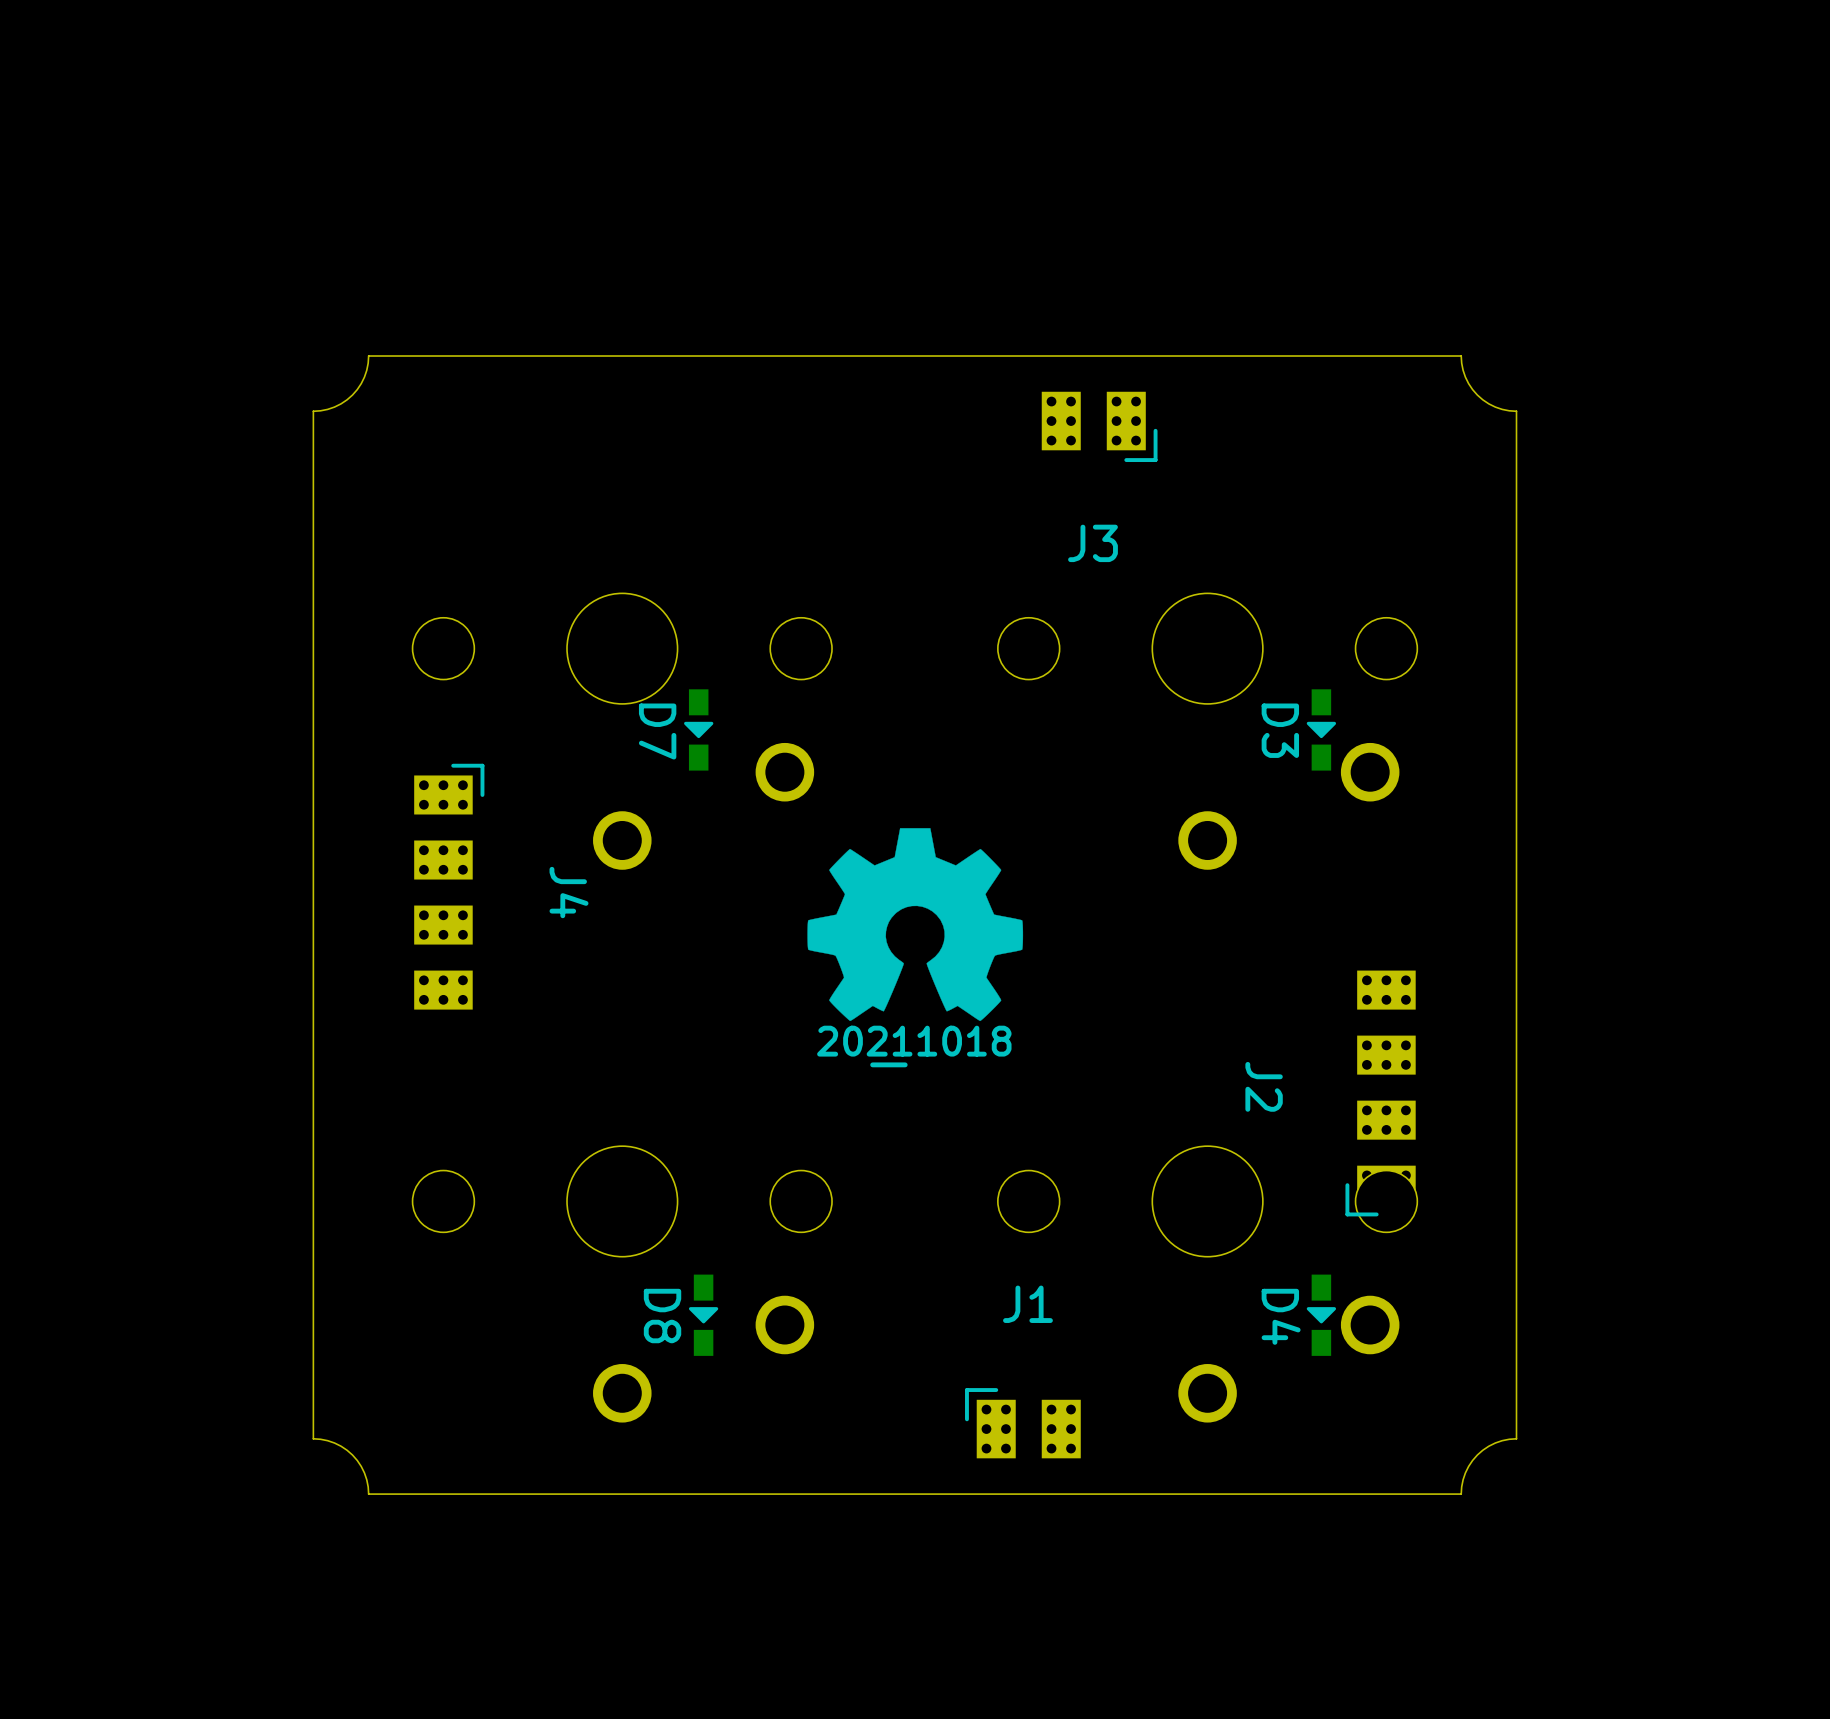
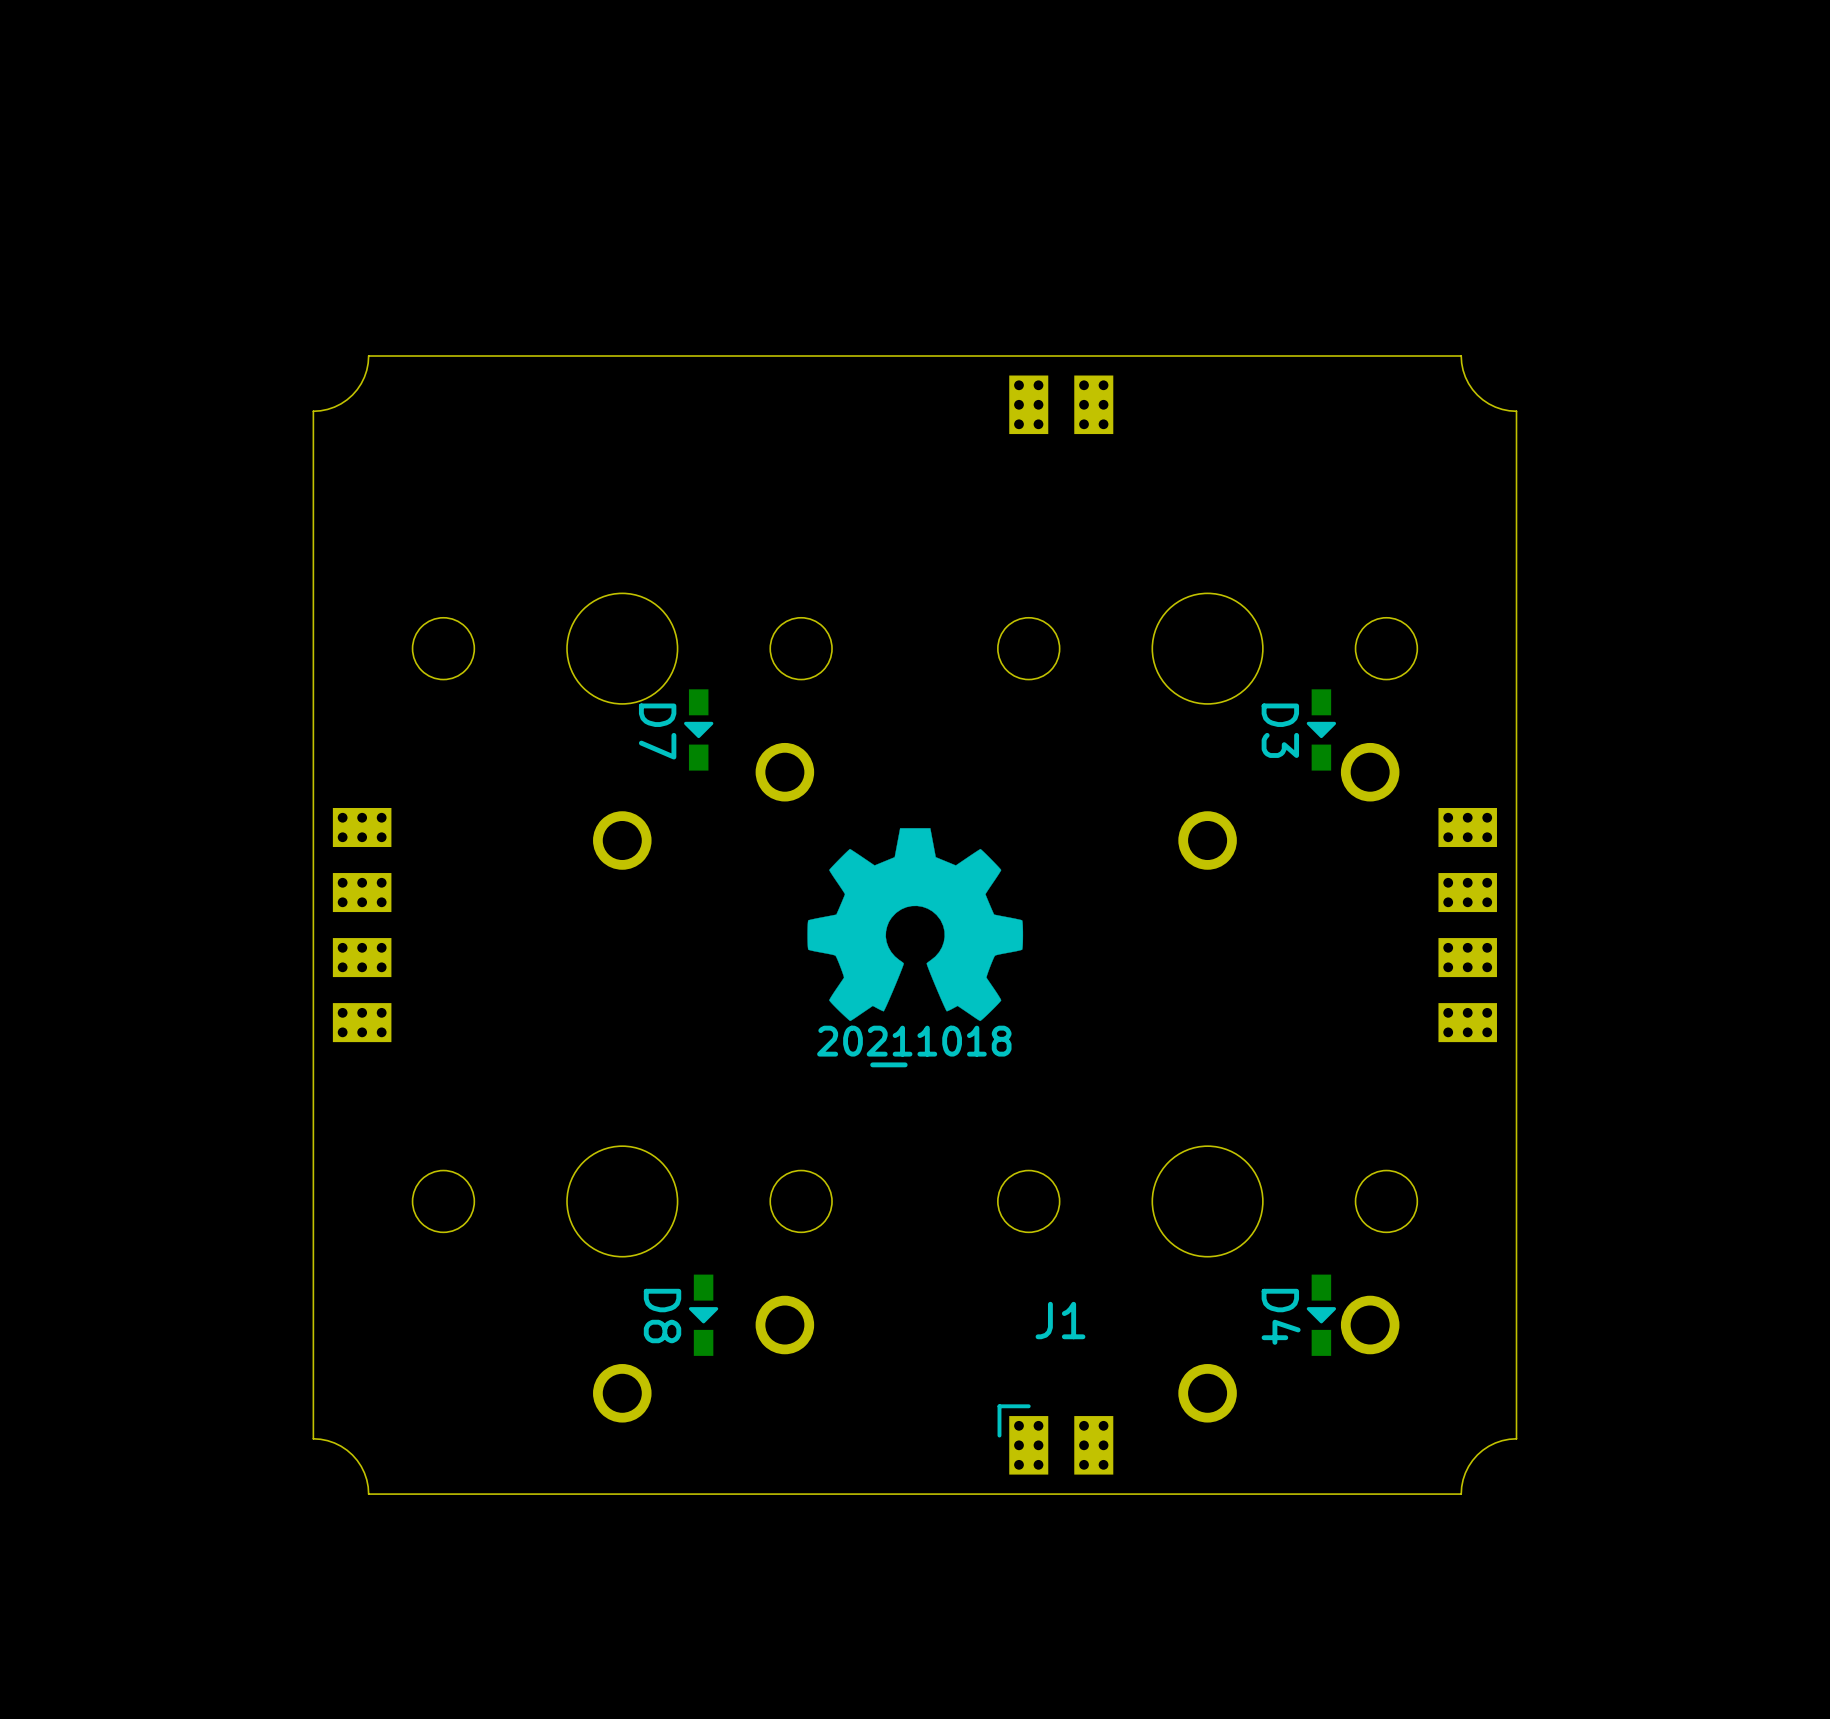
J3 side: bottom (1099, 426) -> top (1061, 404)
J4 side: bottom (449, 886) -> top (362, 925)
J2 side: bottom (1380, 1093) -> top (1467, 925)
J1 position: (1022, 1423) -> (1055, 1439)

